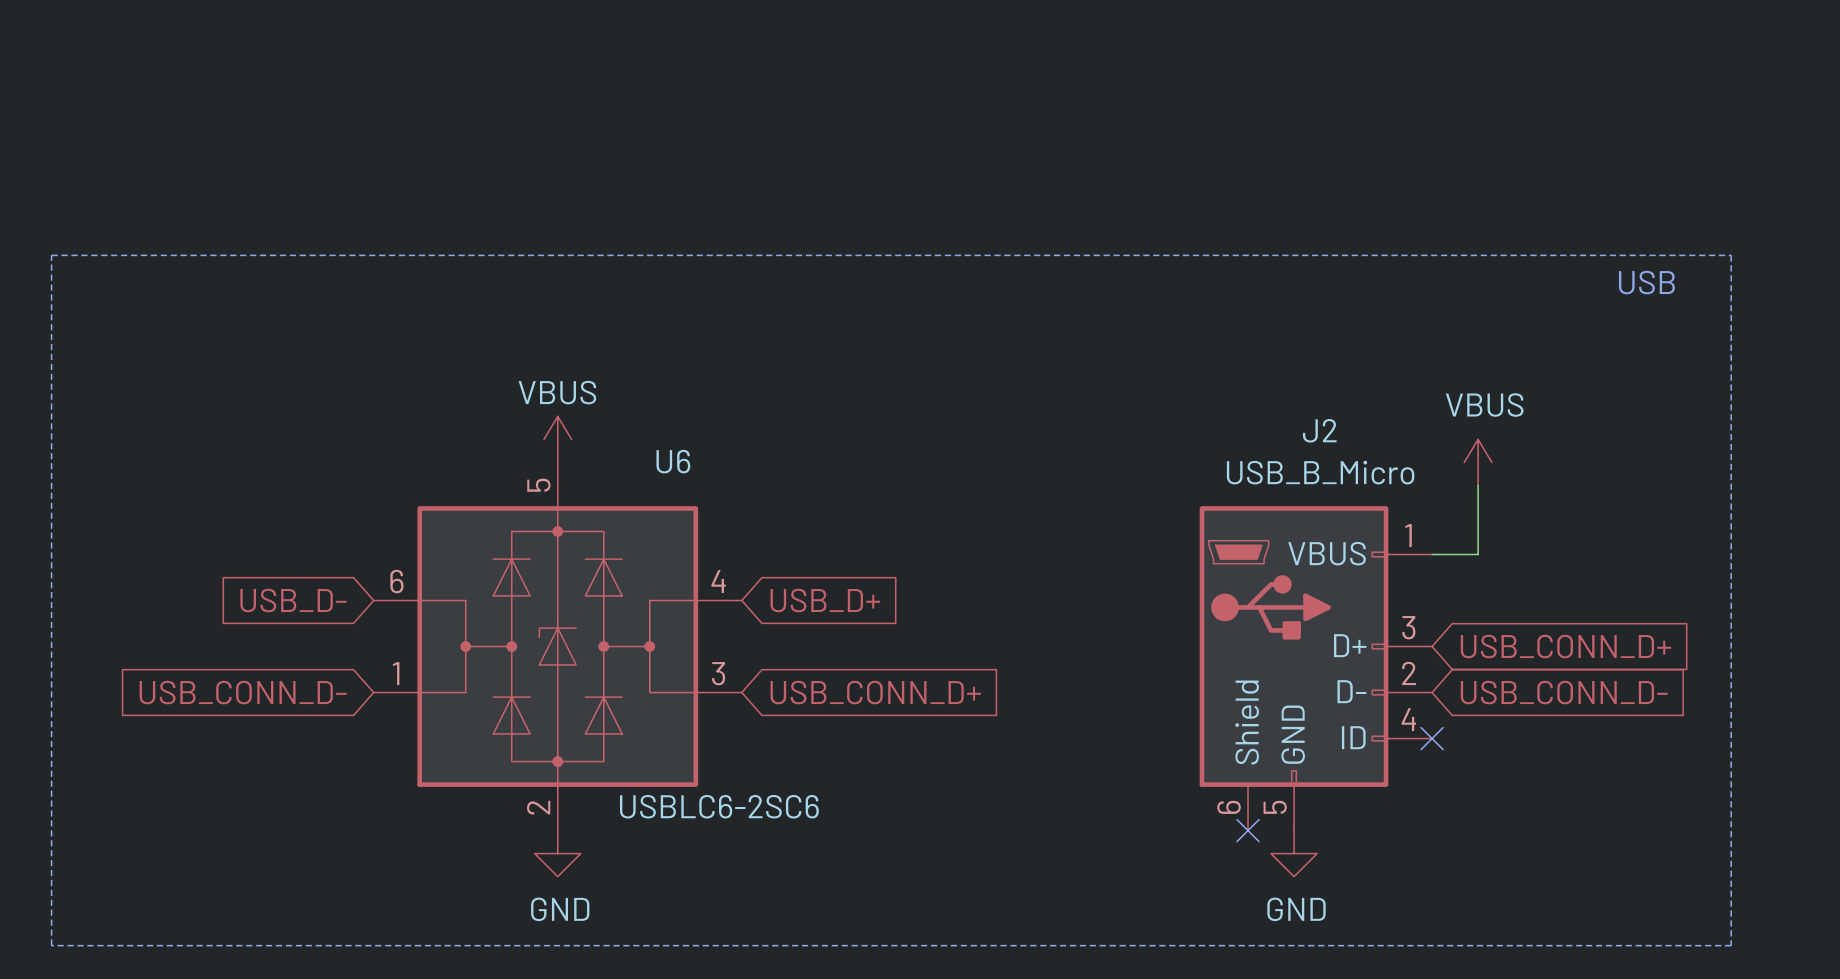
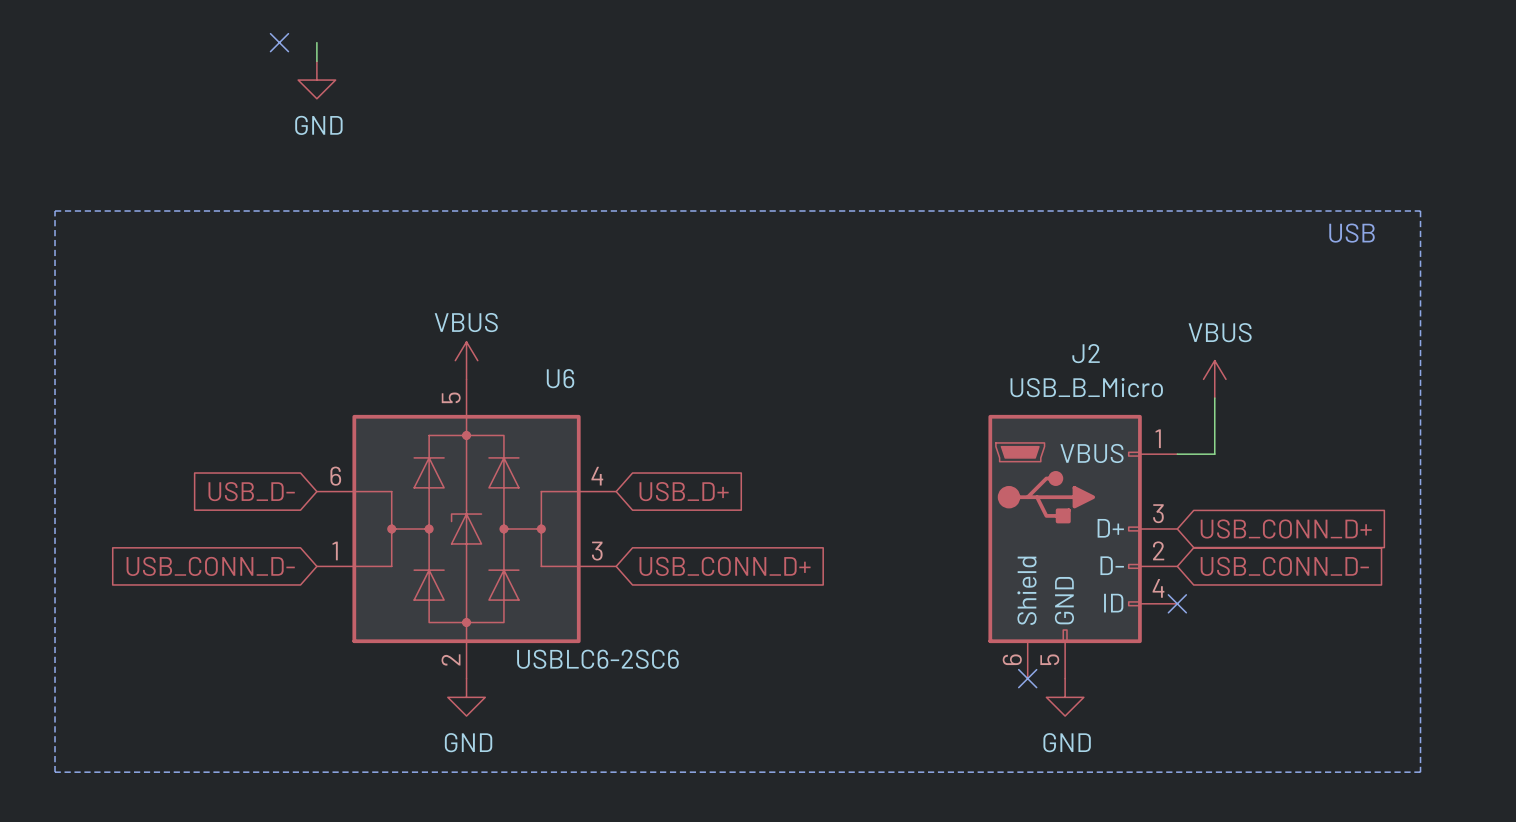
no-connect mark: none -> (279, 42)
wire: none -> (316, 42) (316, 61)
power symbol: none -> GND (316, 80)

